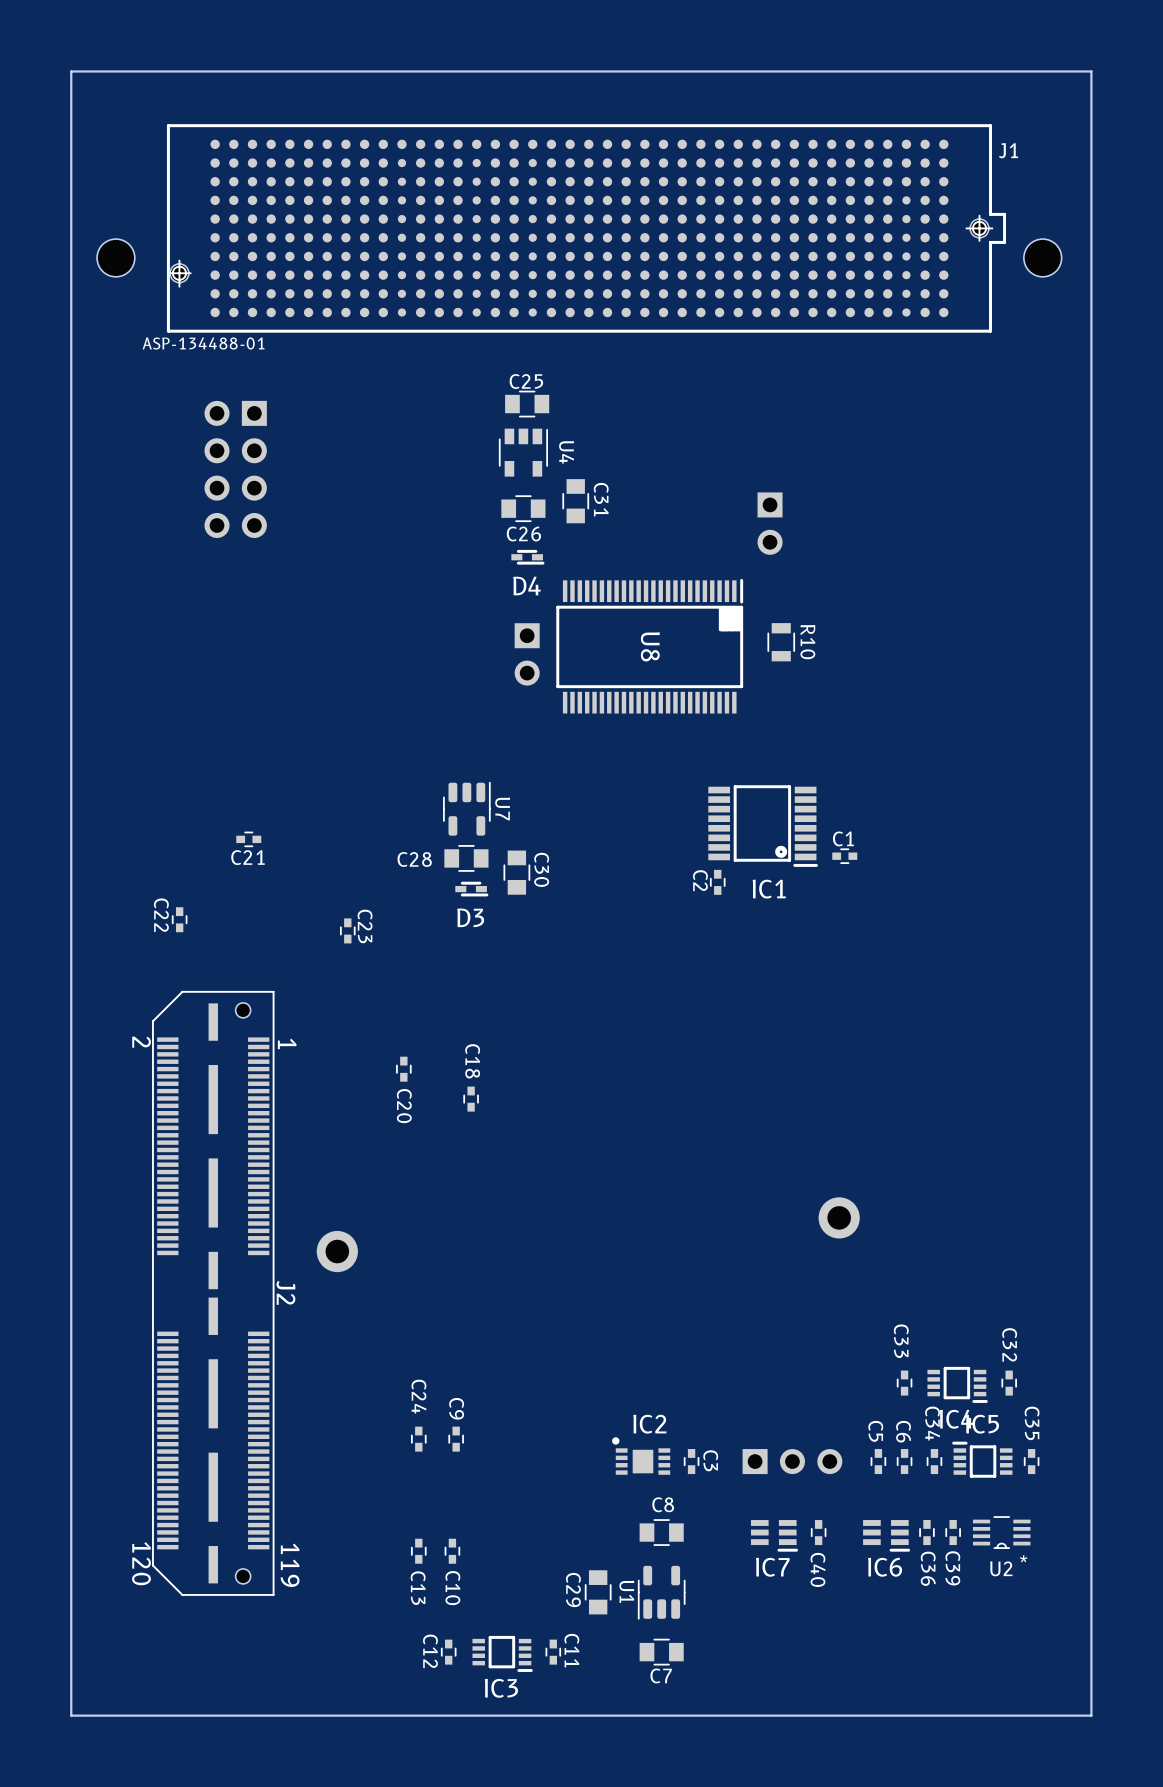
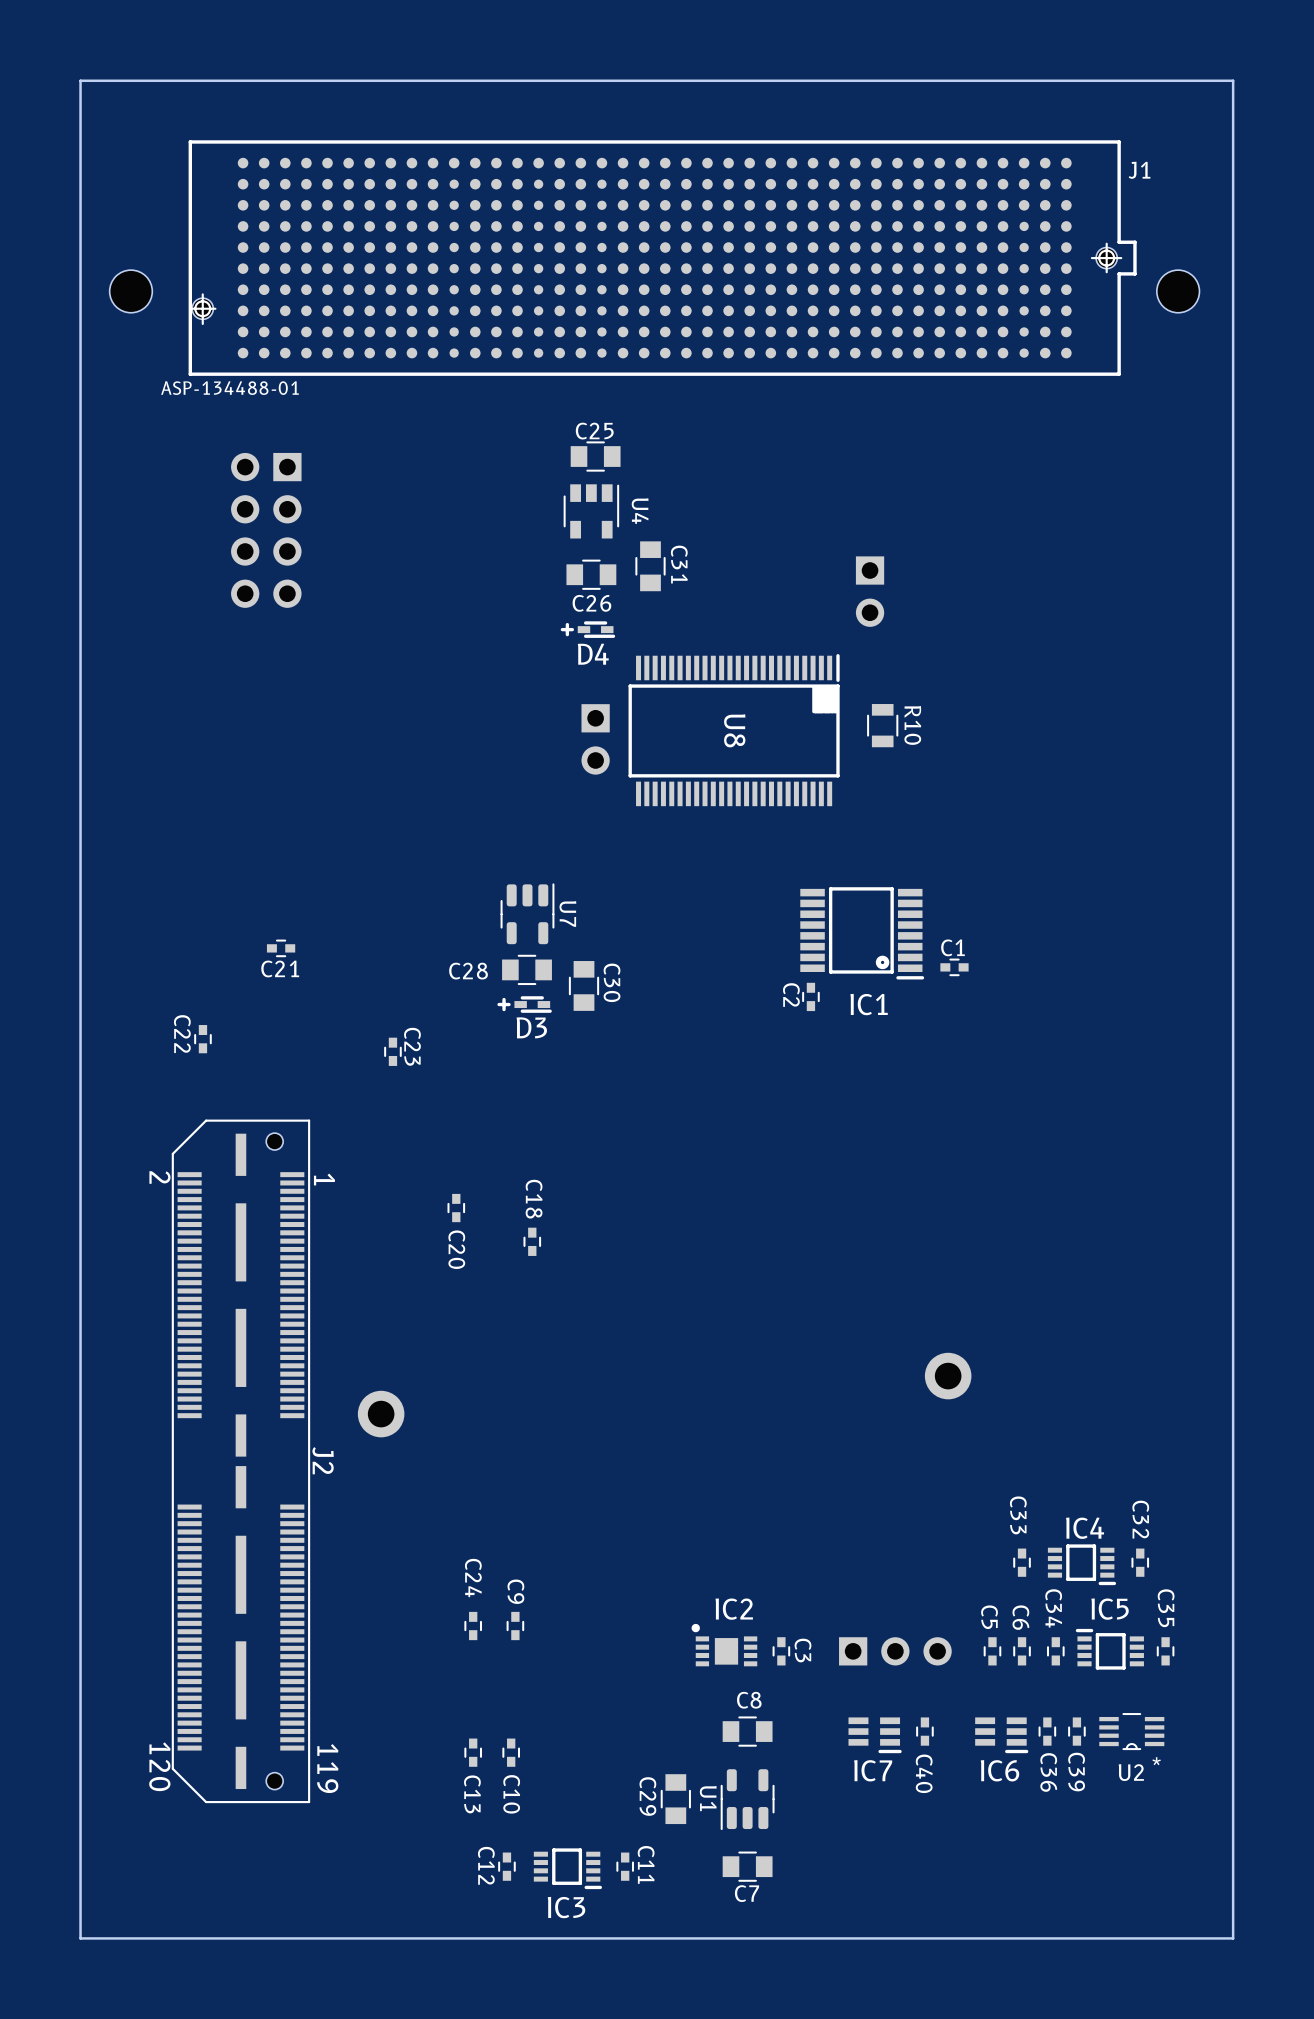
D4 footprint: [511, 549, 545, 565] -> [560, 621, 616, 638]
D3 footprint: [455, 881, 489, 897] -> [497, 996, 552, 1013]
IC4 name position: IC4 (956, 1419) -> IC4 (1085, 1528)

